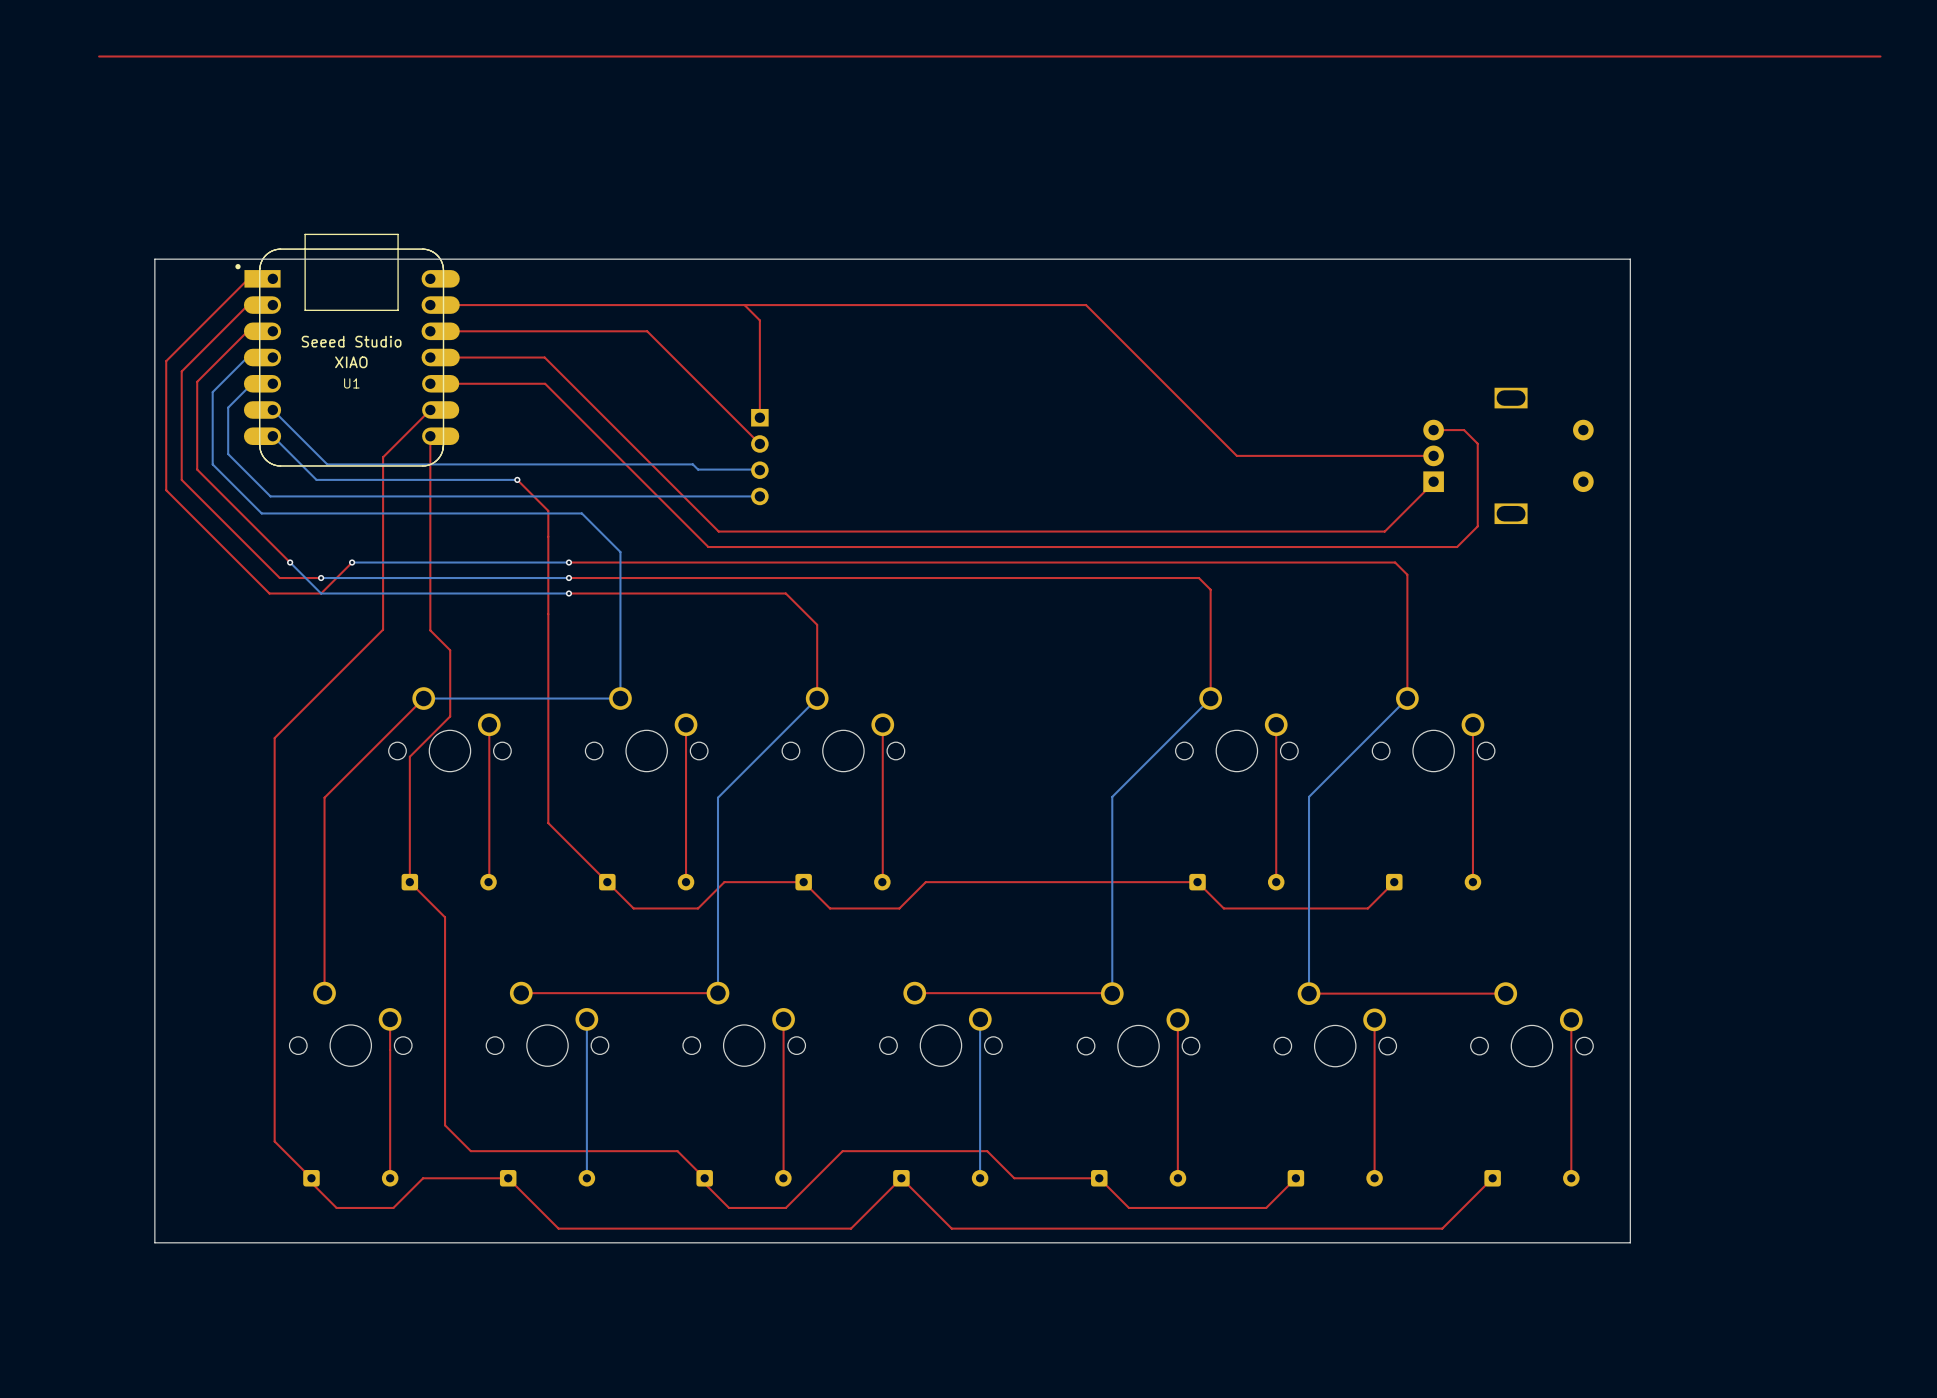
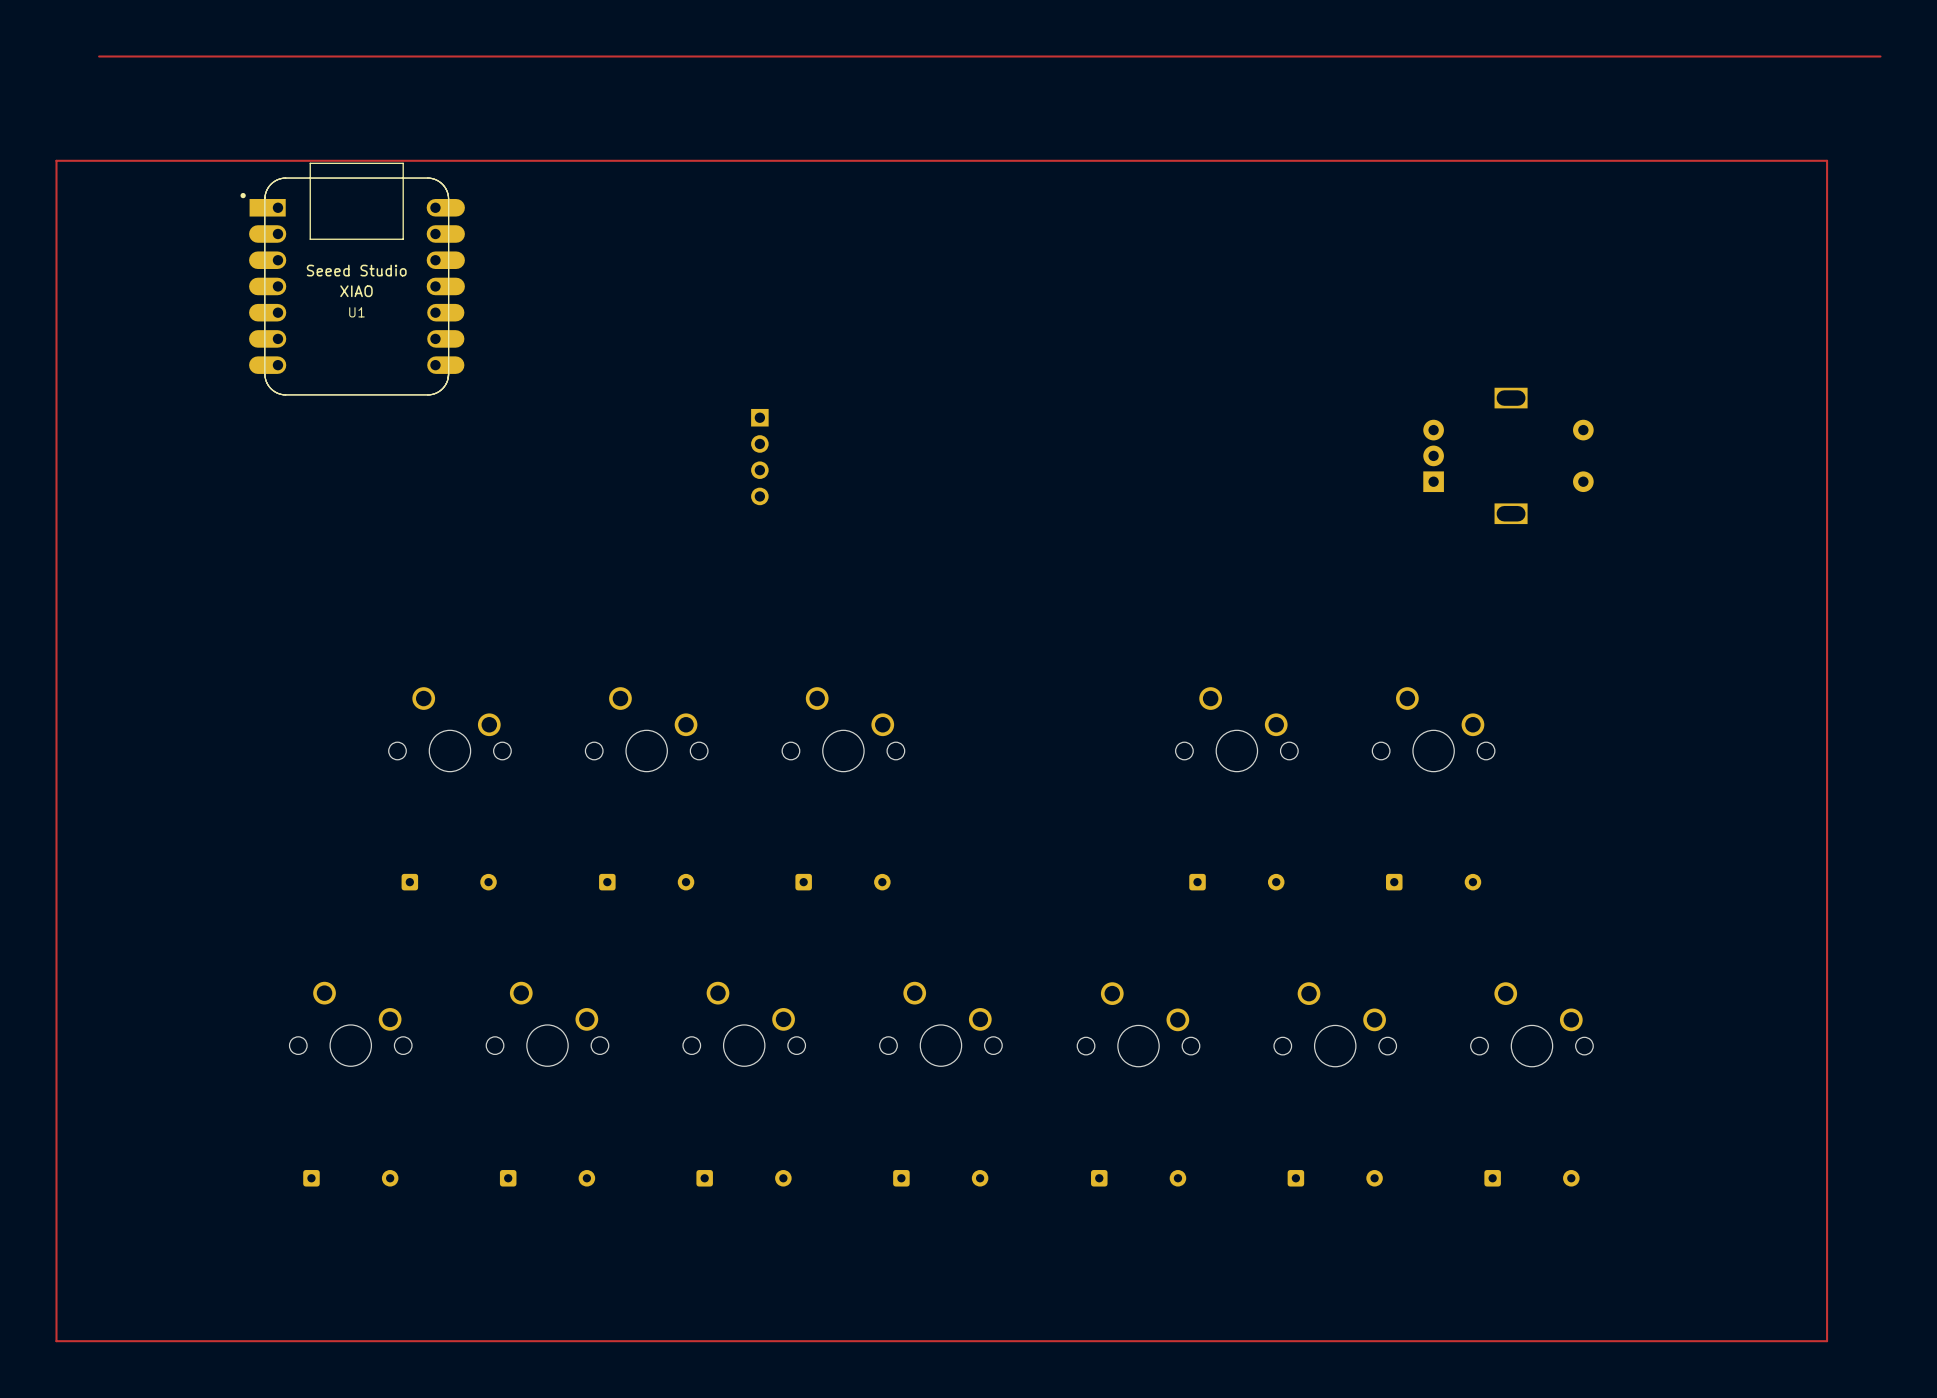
top track: none -> (1827, 160) (1827, 1341) (56, 1341) (56, 160) (1827, 160)
board edge: (1630, 259) (154, 259) (154, 1242) (1630, 1242) (1630, 259) -> none
top track: (272, 278) (248, 278) (166, 361) (166, 490) (269, 593) (321, 593) (352, 562) -> none
top track: (272, 305) (248, 305) (181, 371) (181, 479) (279, 578) (321, 578) -> none
top track: (430, 305) (1086, 305) (1236, 455) (1433, 455) -> none
top track: (744, 305) (759, 320) (759, 417) -> none
top track: (272, 331) (247, 331) (197, 381) (197, 469) (290, 562) -> none
top track: (430, 331) (647, 331) (759, 443) -> none
U1 position: (347, 350) -> (352, 279)
bottom track: (272, 357) (247, 357) (212, 392) (212, 464) (261, 513) (581, 513) (620, 552) (620, 698) (423, 698) -> none
top track: (430, 357) (544, 357) (718, 531) (1384, 531) (1433, 481) -> none
bottom track: (272, 383) (252, 383) (228, 407) (228, 454) (270, 496) (759, 496) -> none
top track: (430, 383) (545, 383) (708, 547) (1457, 547) (1477, 526) (1477, 443) (1464, 430) (1433, 430) -> none
bottom track: (272, 409) (327, 464) (692, 464) (698, 469) (759, 470) -> none
top track: (430, 409) (383, 457) (383, 629) (274, 738) (274, 1141) (311, 1178) (311, 1182) (336, 1207) (393, 1207) (423, 1178) (508, 1178) (558, 1228) (851, 1228) (901, 1178) (951, 1228) (1442, 1228) (1492, 1178) -> none
bottom track: (272, 436) (316, 479) (517, 479) -> none
top track: (430, 436) (430, 630) (450, 650) (450, 716) (409, 756) (409, 882) (445, 917) (445, 1125) (470, 1151) (677, 1151) (704, 1178) (704, 1183) (729, 1207) (785, 1207) (842, 1151) (987, 1151) (1014, 1178) (1099, 1178) (1128, 1207) (1266, 1207) (1295, 1178) -> none
top track: (517, 479) (548, 510) (548, 823) (633, 908) (698, 908) (724, 882) (803, 882) (829, 908) (899, 908) (925, 882) (1197, 882) (1223, 908) (1367, 908) (1394, 882) -> none
via: (517, 479) -> none
bottom track: (290, 562) (321, 593) (568, 593) -> none
via: (290, 562) -> none
via: (352, 562) -> none
top track: (568, 562) (1395, 562) (1407, 574) (1407, 698) -> none
bottom track: (568, 562) (352, 562) -> none
via: (568, 562) -> none
via: (321, 578) -> none
top track: (568, 578) (1198, 578) (1210, 589) (1210, 698) -> none
bottom track: (568, 578) (321, 578) -> none
via: (568, 578) -> none
top track: (568, 593) (785, 593) (817, 624) (817, 698) -> none
via: (568, 593) -> none
top track: (423, 698) (324, 797) (324, 993) -> none
bottom track: (817, 698) (717, 797) (717, 993) -> none
bottom track: (1210, 698) (1112, 796) (1112, 993) -> none
bottom track: (1407, 698) (1309, 796) (1309, 993) -> none
top track: (489, 724) (488, 882) -> none
top track: (686, 724) (686, 882) -> none
top track: (882, 724) (882, 882) -> none
top track: (1276, 724) (1276, 882) -> none
top track: (1472, 724) (1472, 882) -> none
top track: (717, 993) (521, 993) -> none
top track: (914, 993) (1112, 993) -> none
top track: (1505, 993) (1309, 993) -> none
top track: (390, 1019) (390, 1050) -> none
bottom track: (586, 1019) (586, 1178) -> none
top track: (783, 1019) (783, 1178) -> none
bottom track: (980, 1019) (980, 1178) -> none
top track: (1177, 1019) (1177, 1178) -> none
top track: (1374, 1019) (1374, 1178) -> none
top track: (1571, 1019) (1571, 1178) -> none
top track: (390, 1050) (390, 1178) -> none

